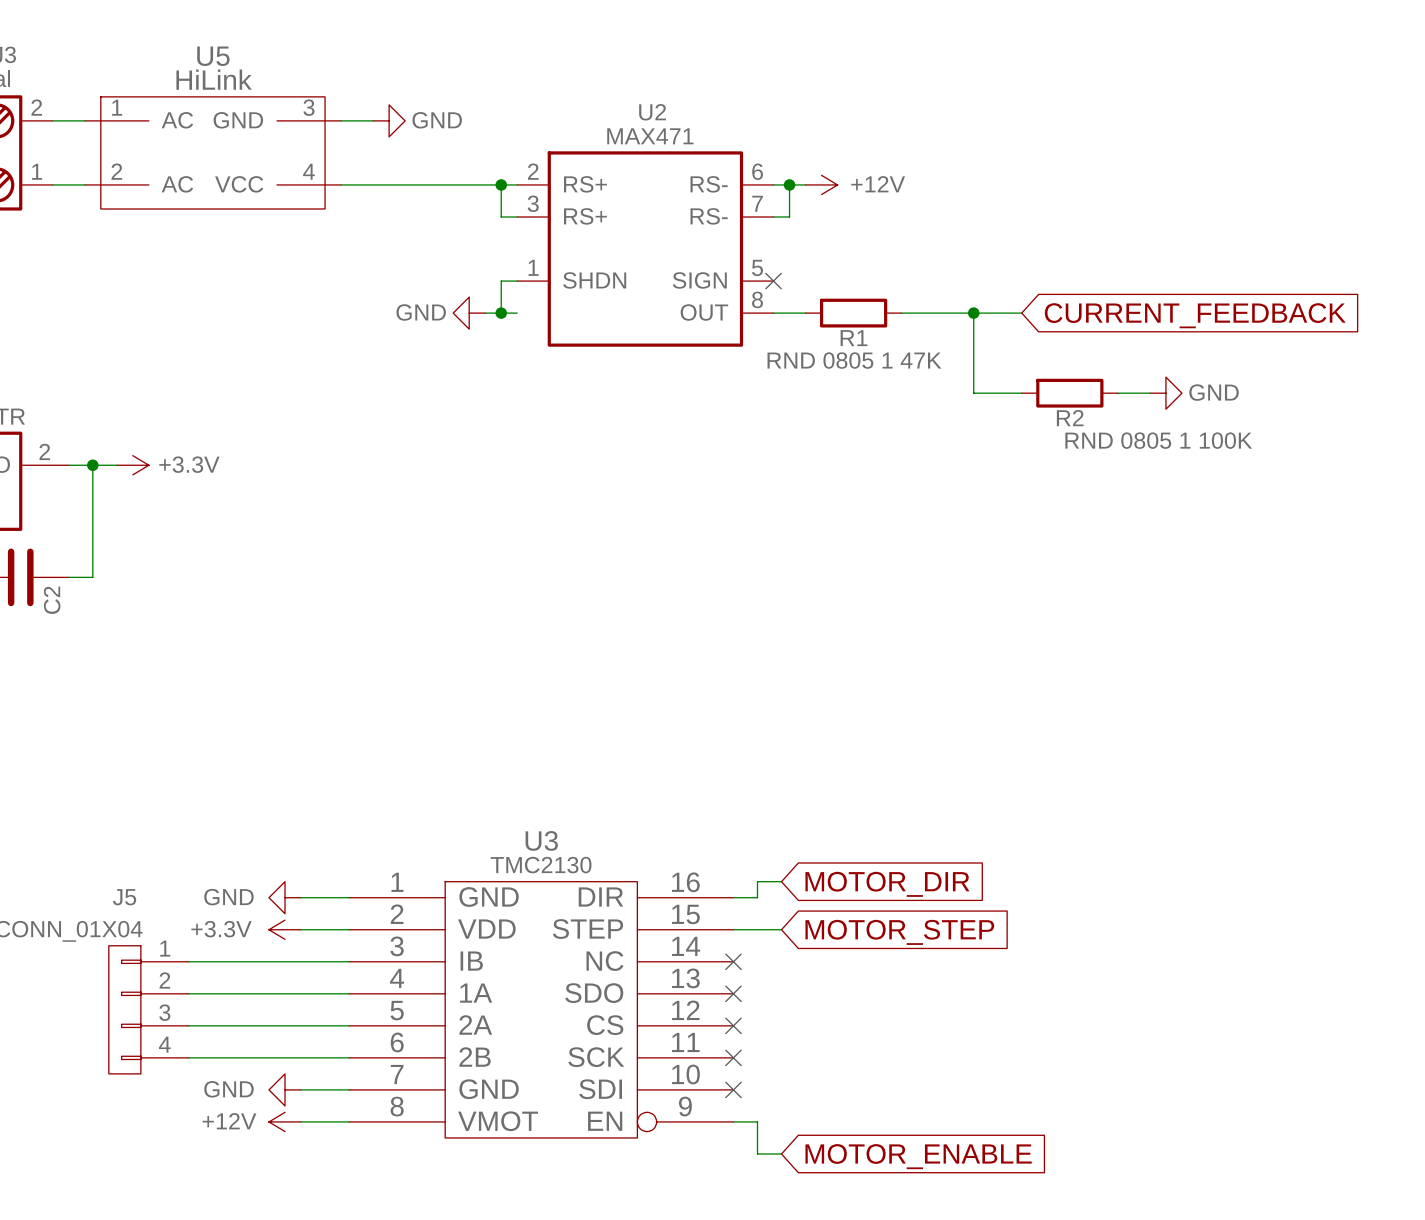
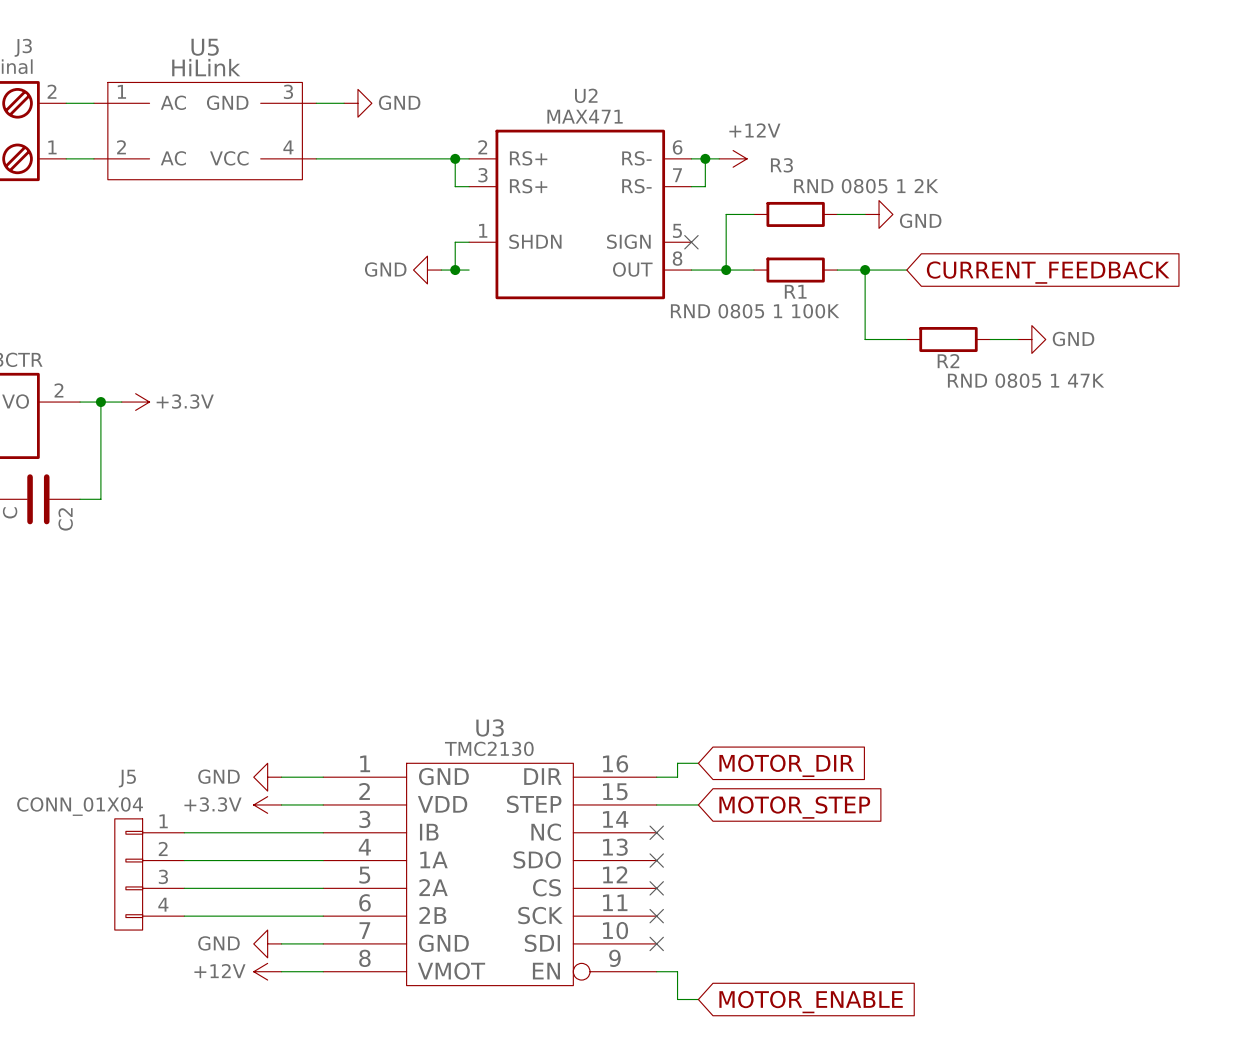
power symbol text position: +12V (878, 184) -> +12V (754, 130)
wire: none -> (753, 214) (726, 214) (726, 270)
R3: none -> RND 0805 1 2K (795, 214)
wire: none -> (837, 214) (865, 214)
power symbol: none -> GND (879, 214)
junction: none -> (726, 270)
R1 position: (853, 313) -> (795, 270)
wire: (901, 313) (941, 313) -> (719, 270) (753, 270)
R1 value: RND 0805 1 47K (854, 360) -> RND 0805 1 100K (755, 311)
R2 value: RND 0805 1 100K (1158, 440) -> RND 0805 1 47K (1026, 380)

